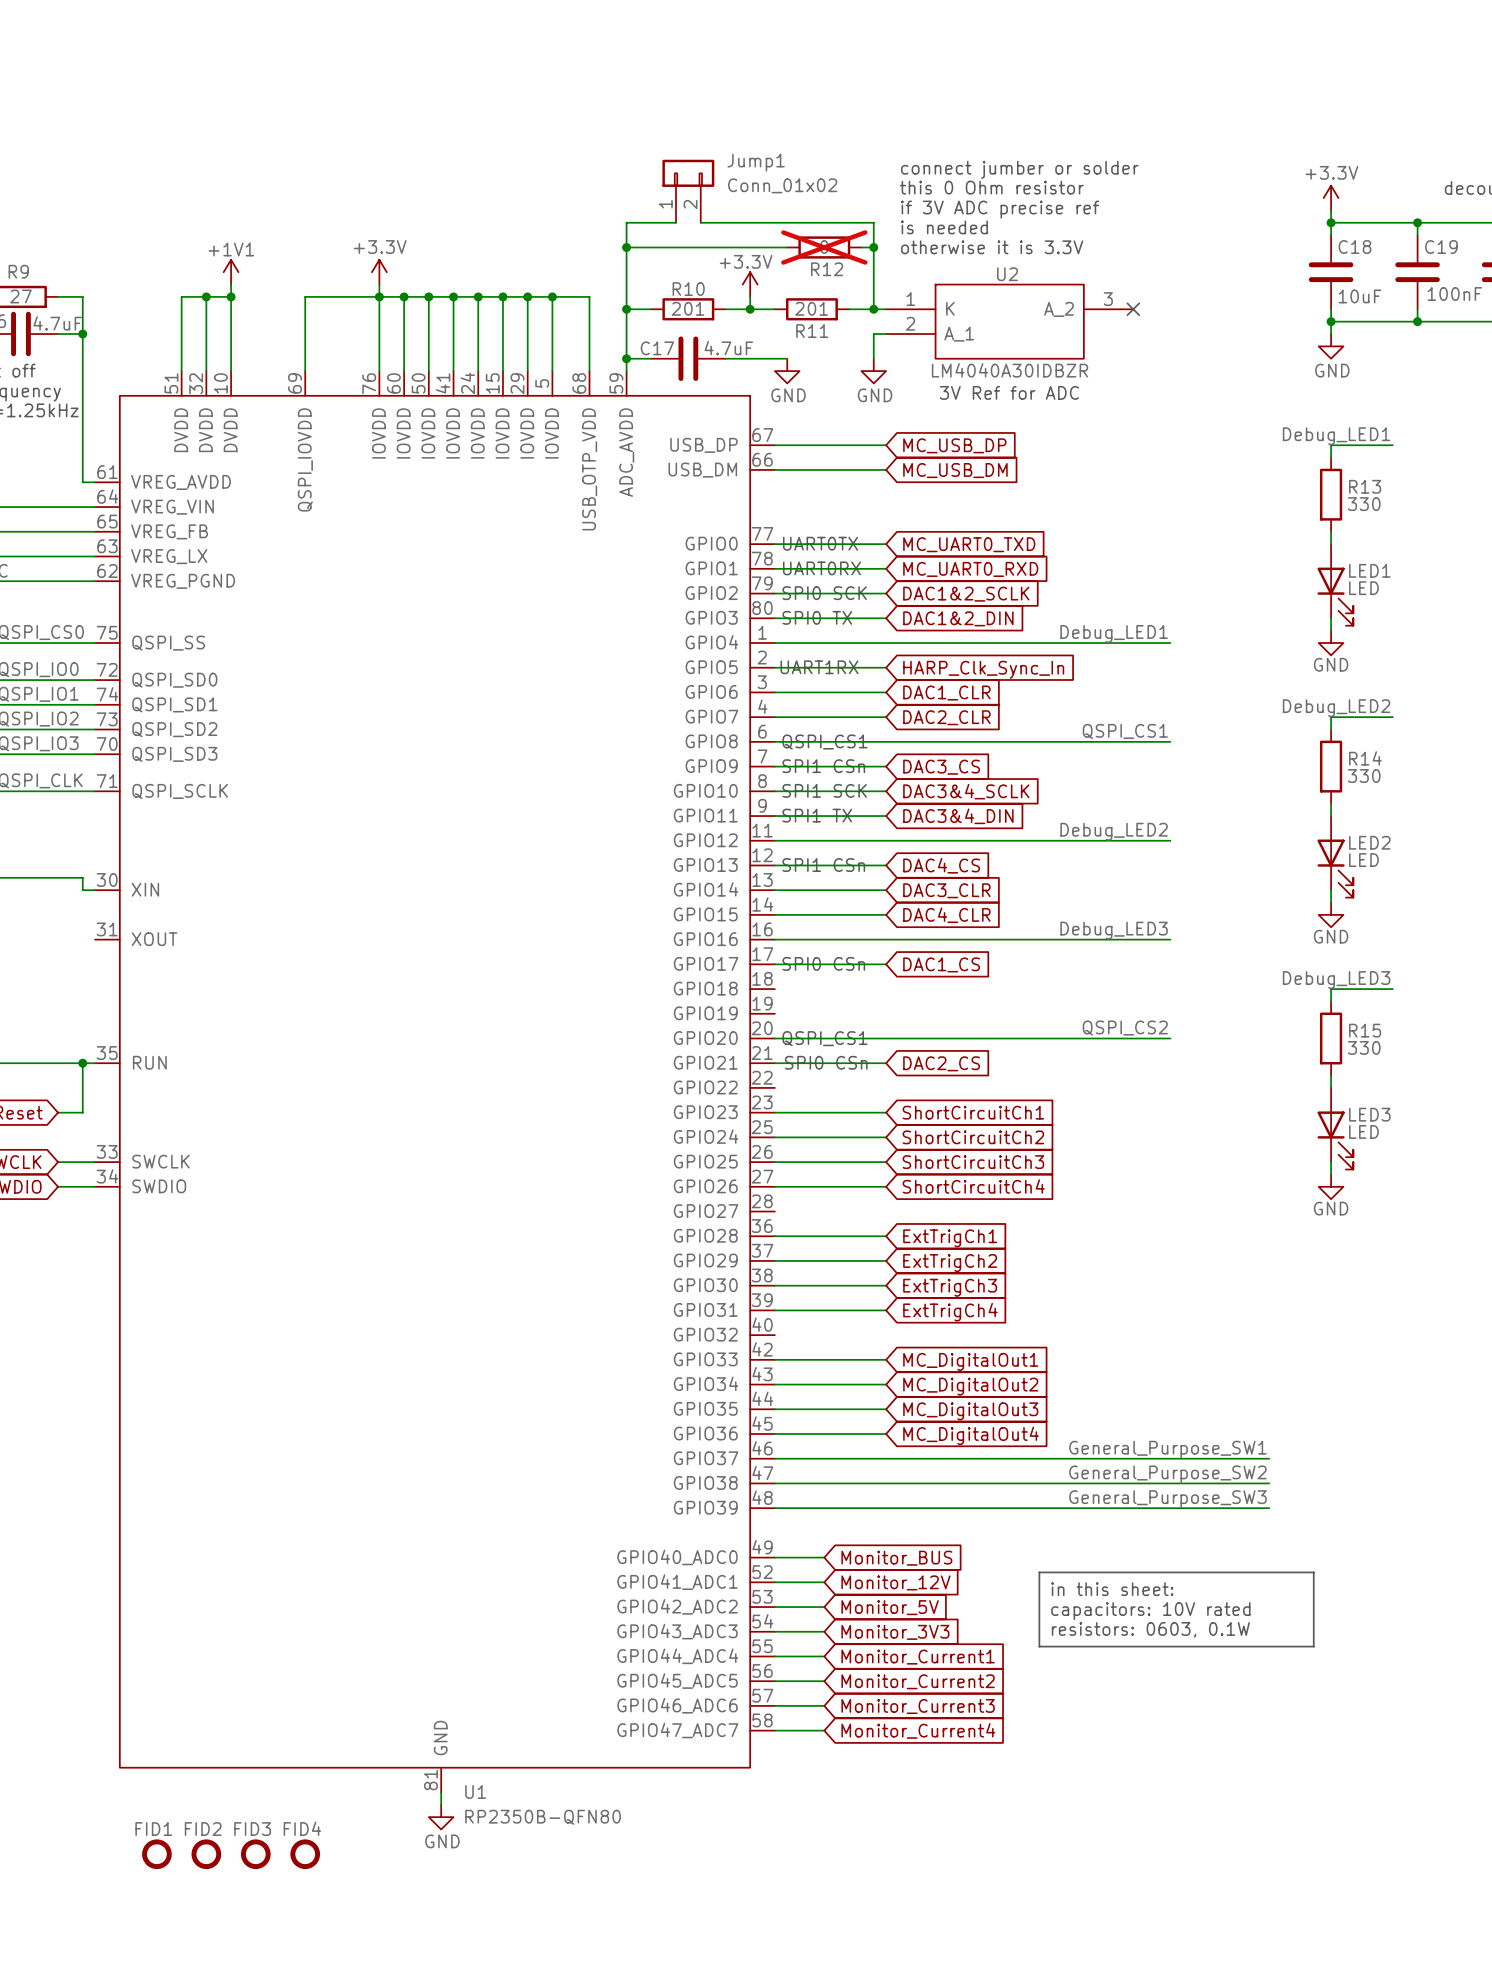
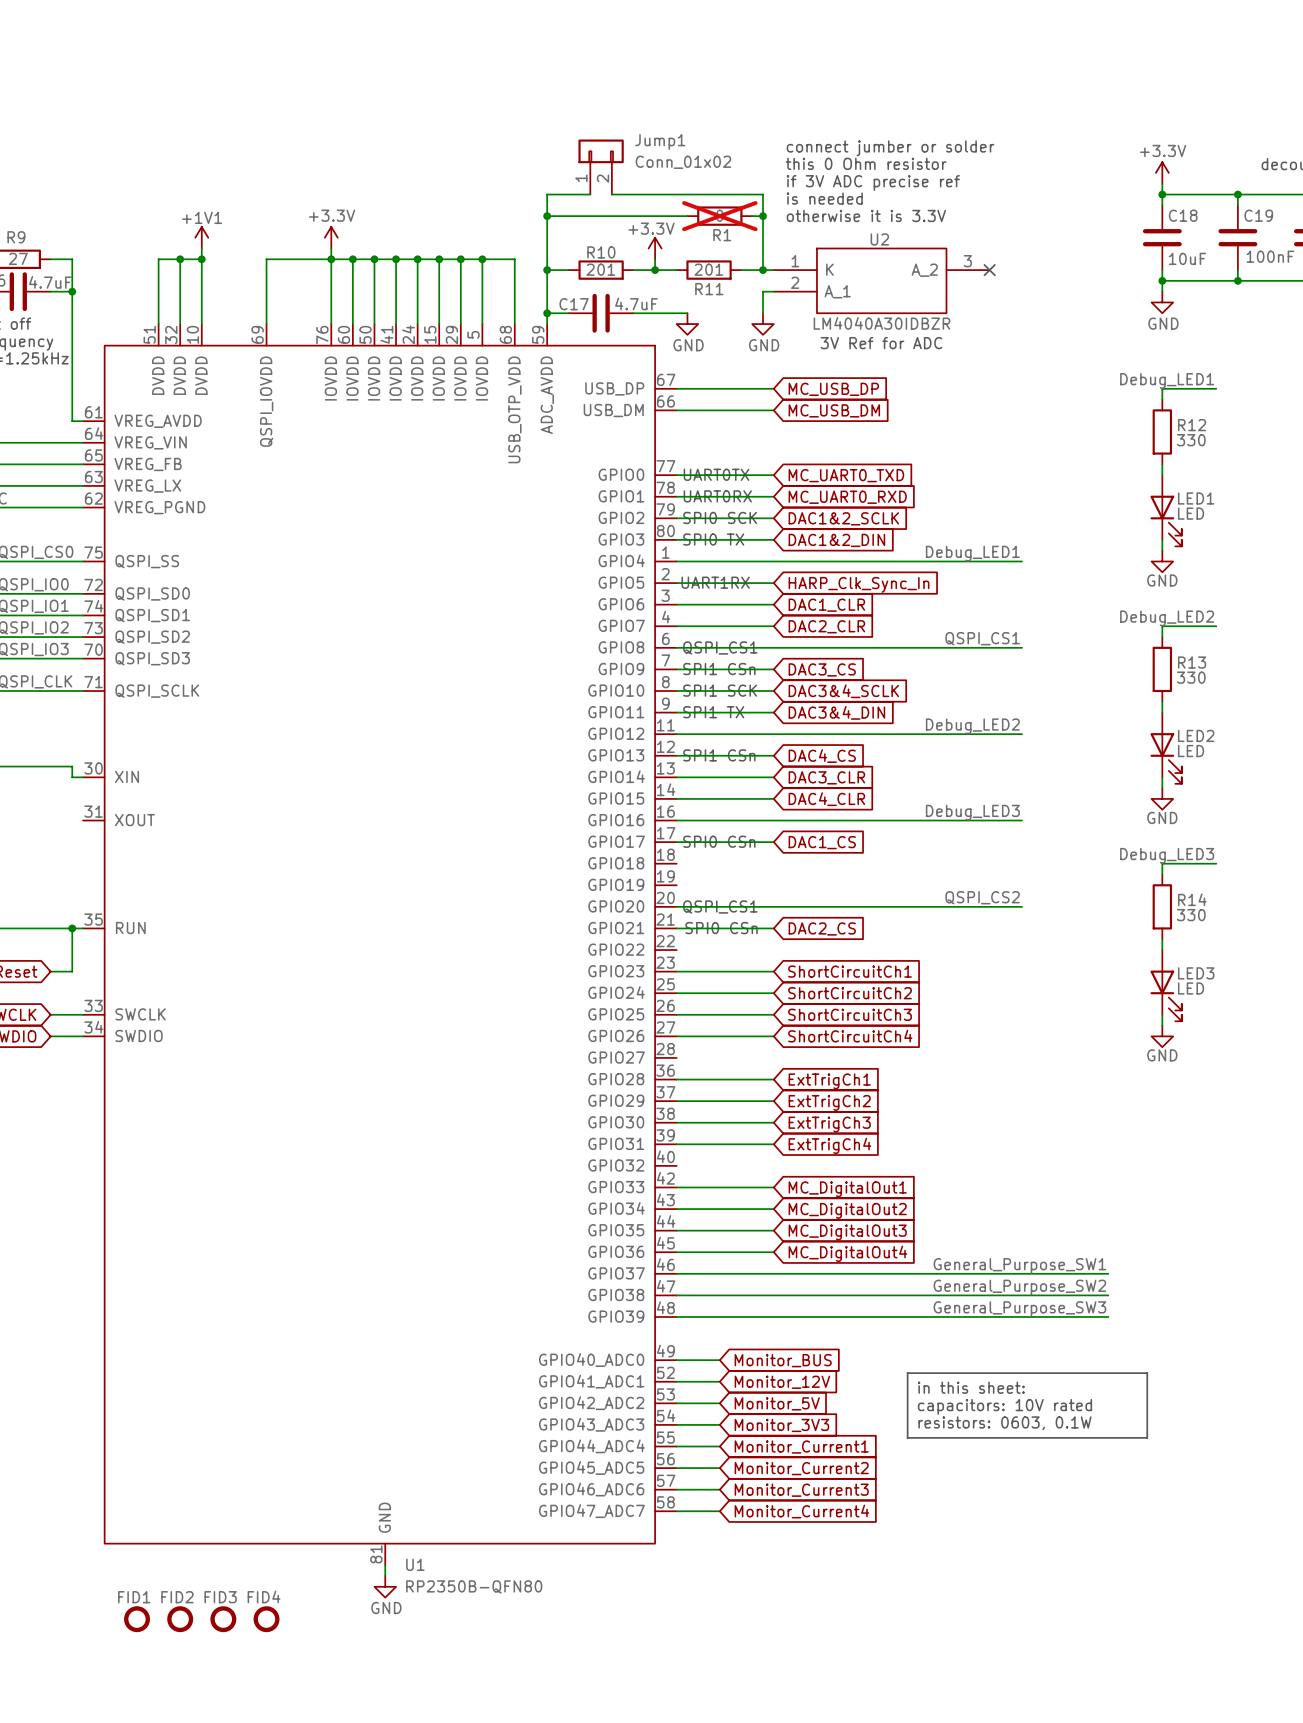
R12 name: R12 (827, 269) -> R1 (722, 235)
R13 name: R13 (1365, 486) -> R12 (1192, 425)
R14 name: R14 (1365, 758) -> R13 (1192, 662)
R15 name: R15 (1365, 1030) -> R14 (1192, 899)

